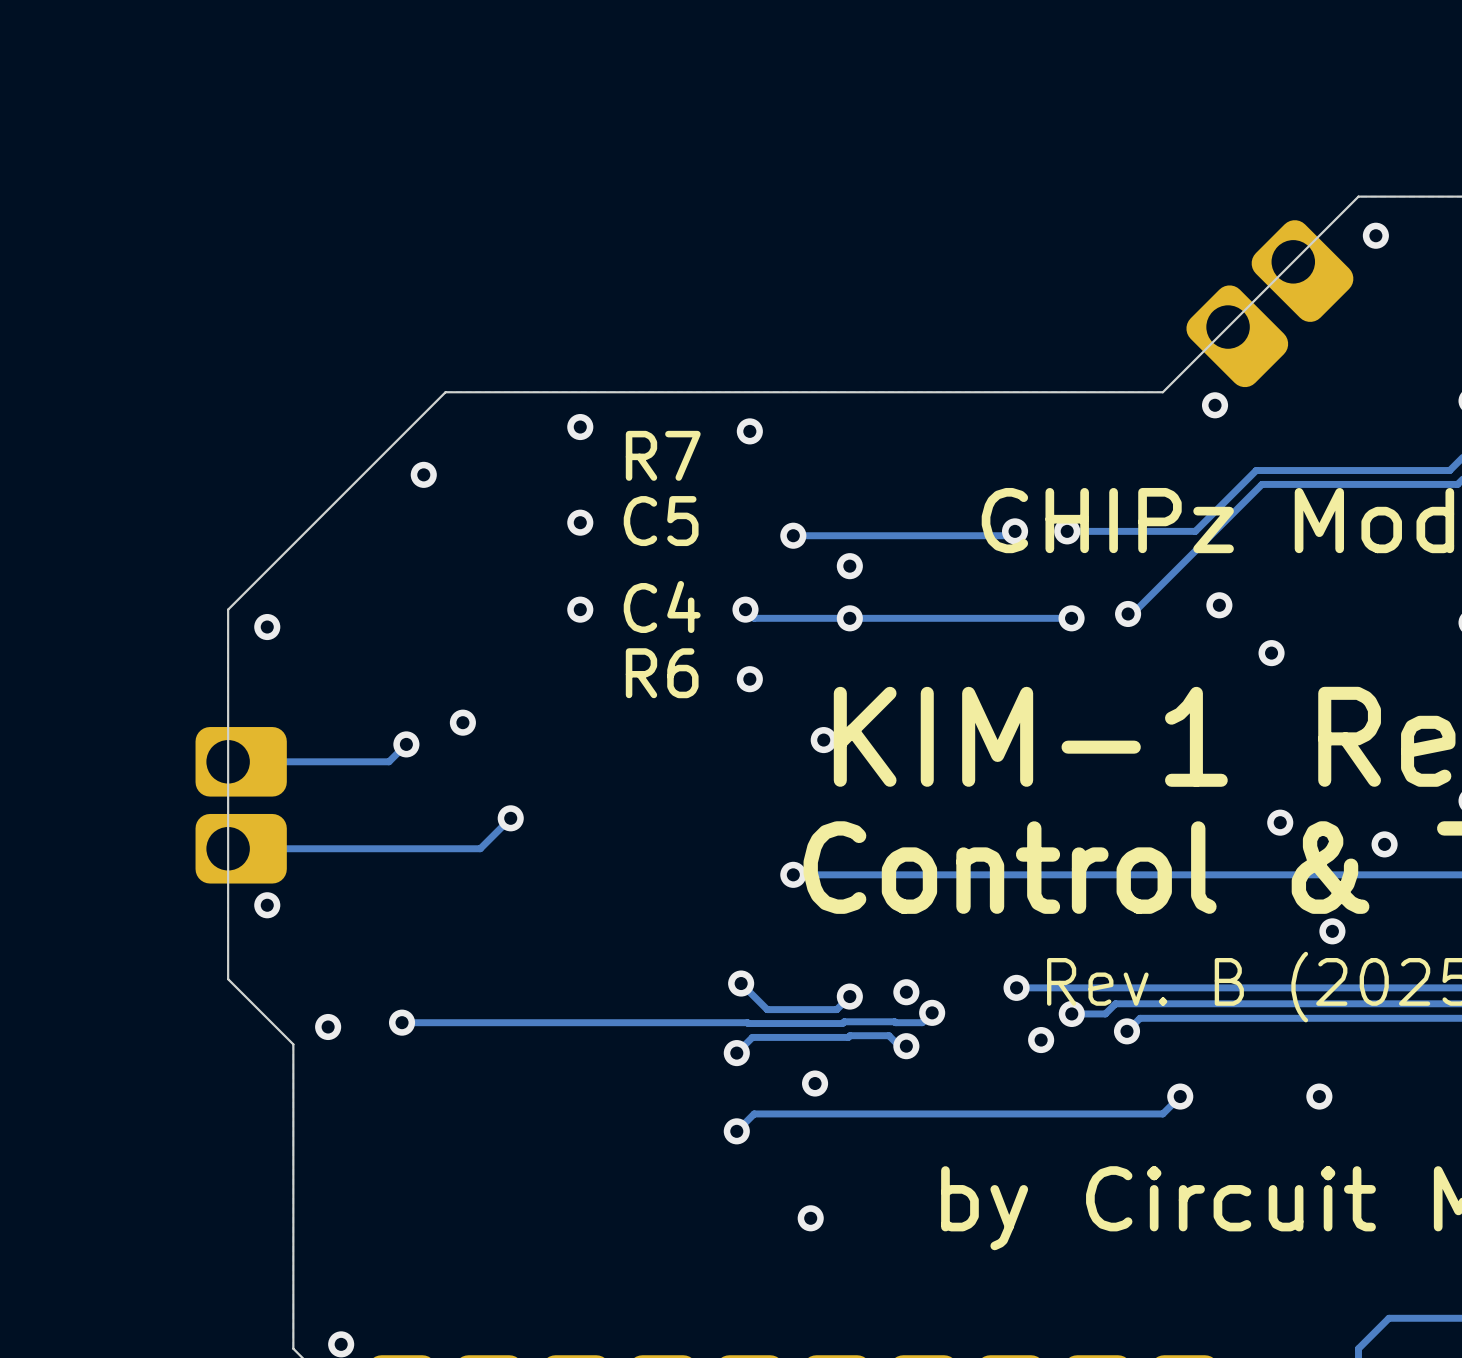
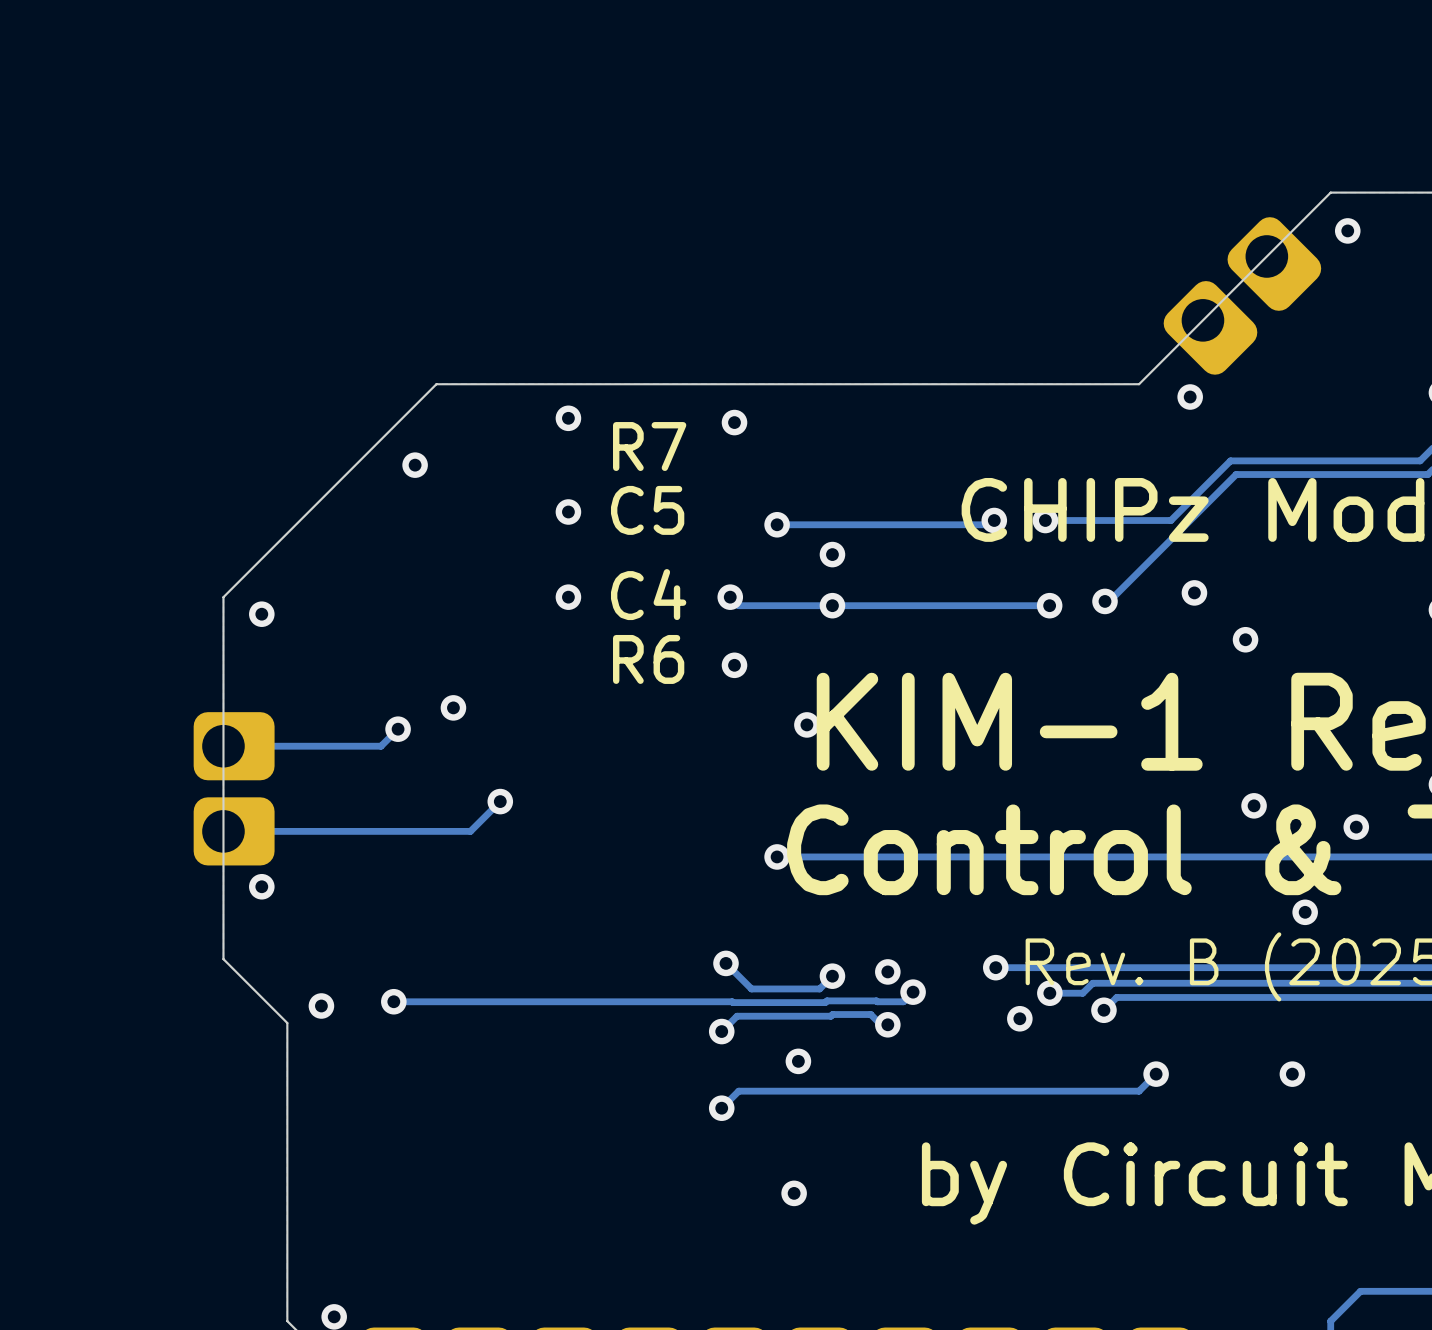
part footprint: [1251, 220, 1354, 322] -> [1227, 217, 1322, 311]
part footprint: [1186, 285, 1289, 388] -> [1163, 281, 1258, 375]
part footprint: [195, 727, 287, 797] -> [193, 712, 275, 781]
part footprint: [195, 813, 287, 884] -> [193, 797, 275, 866]

